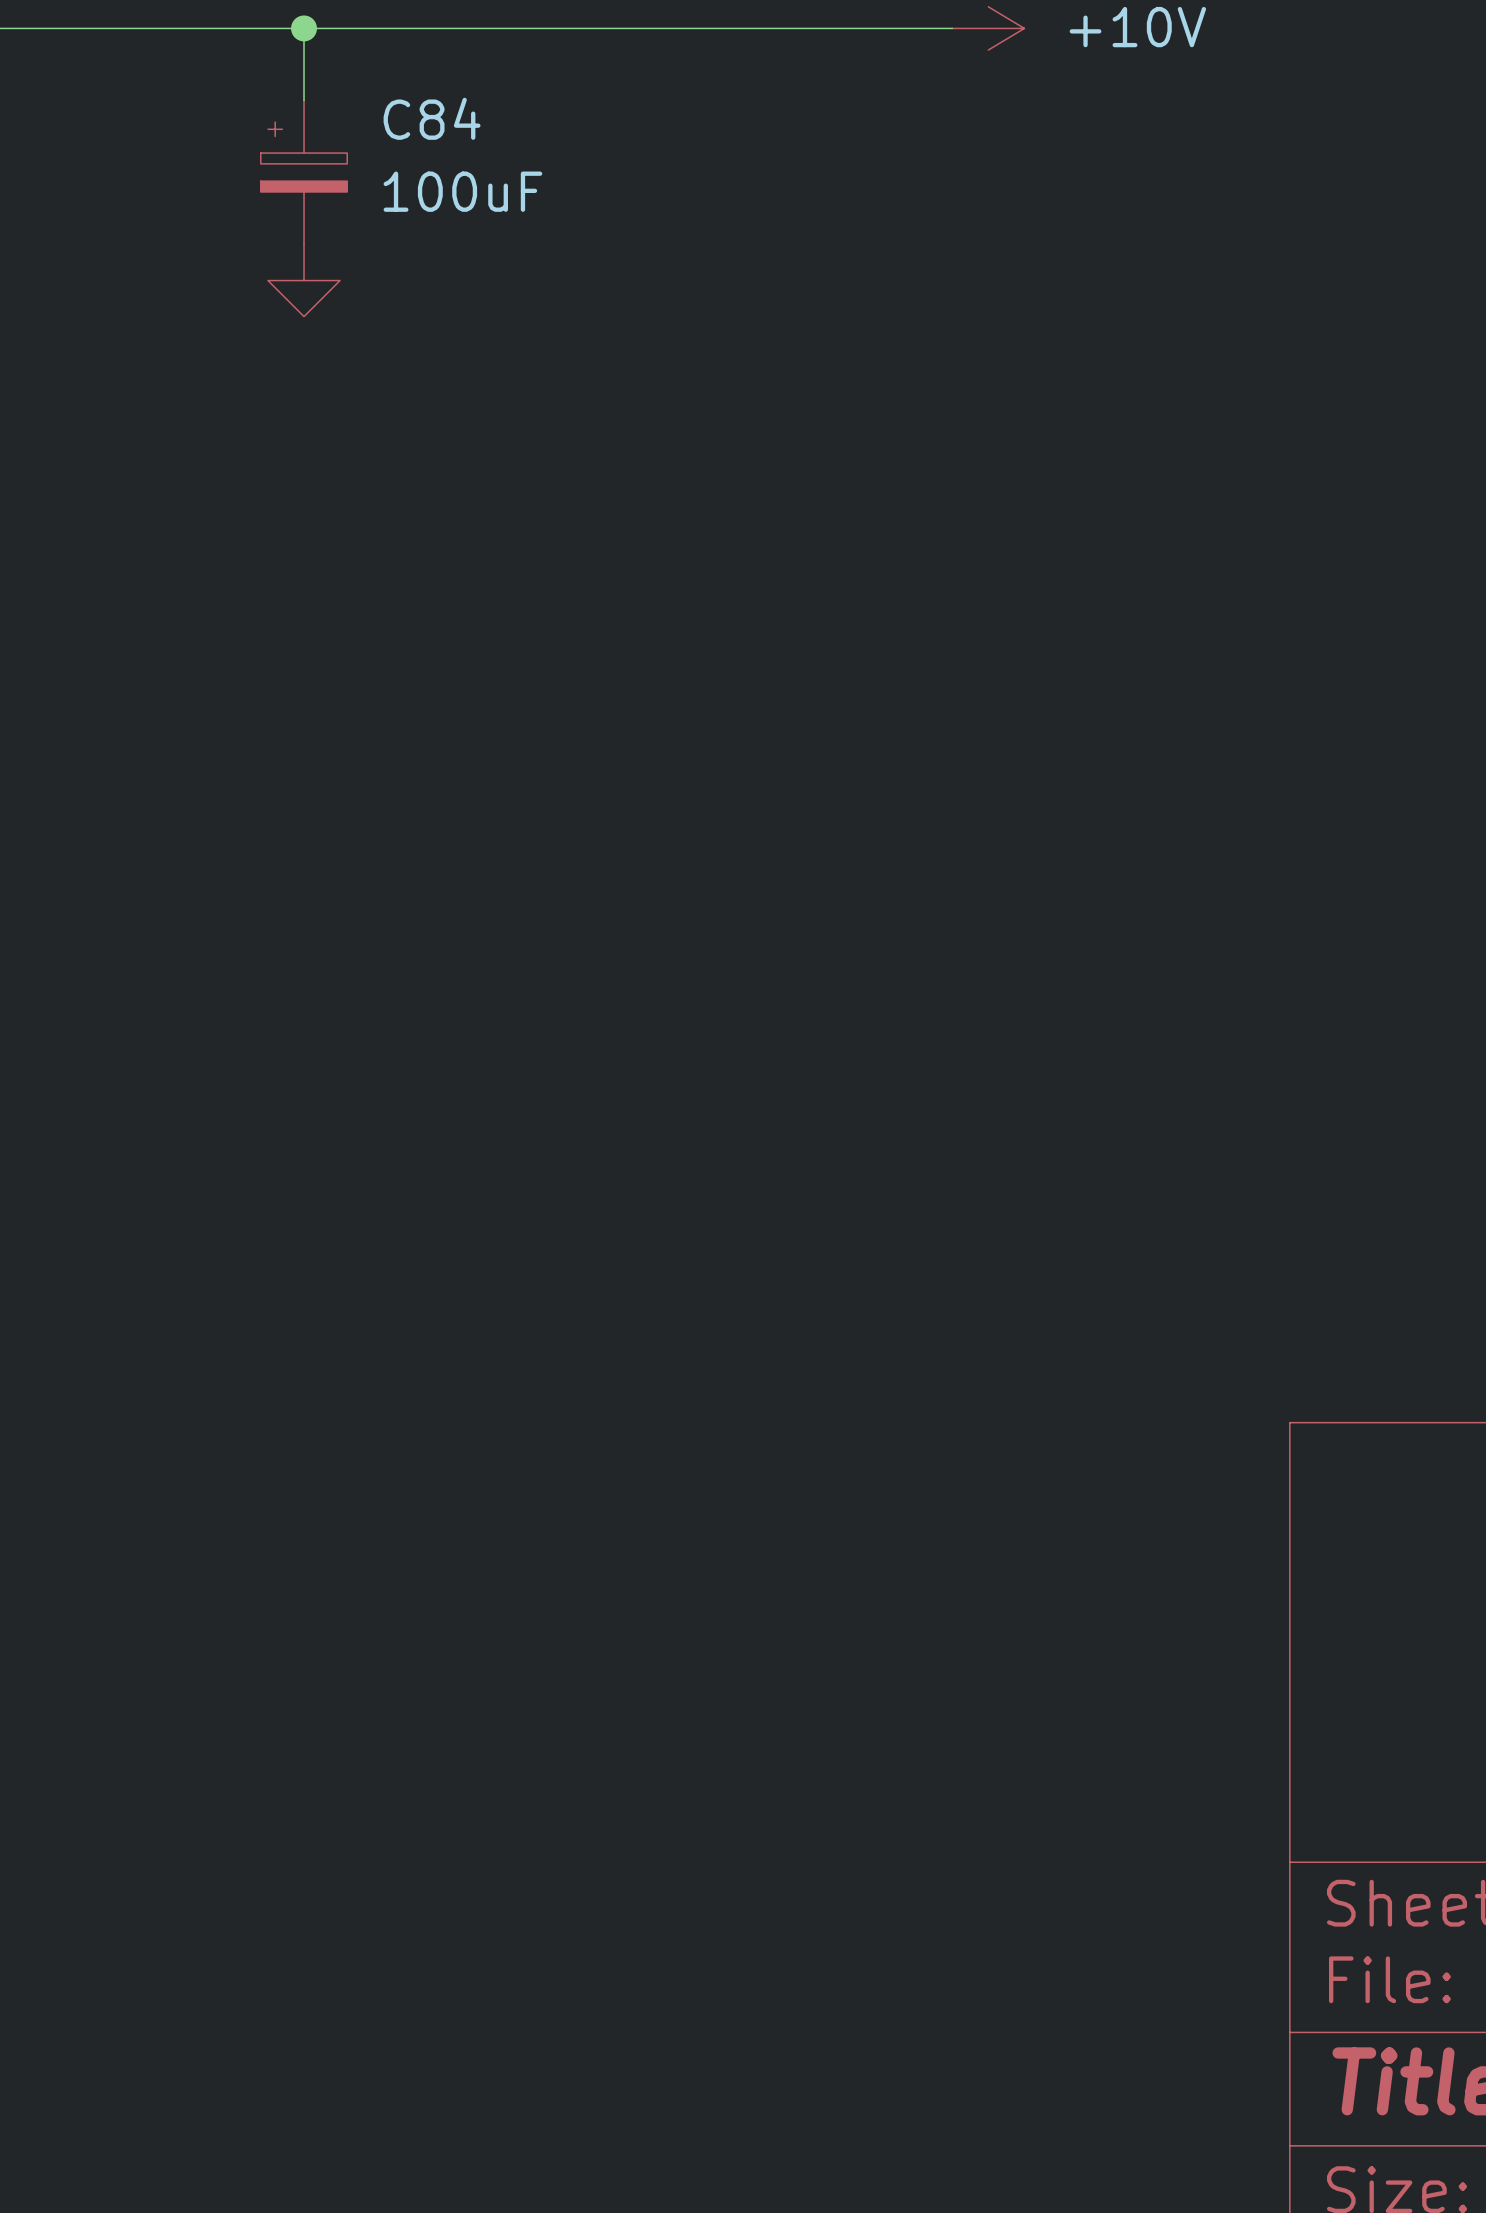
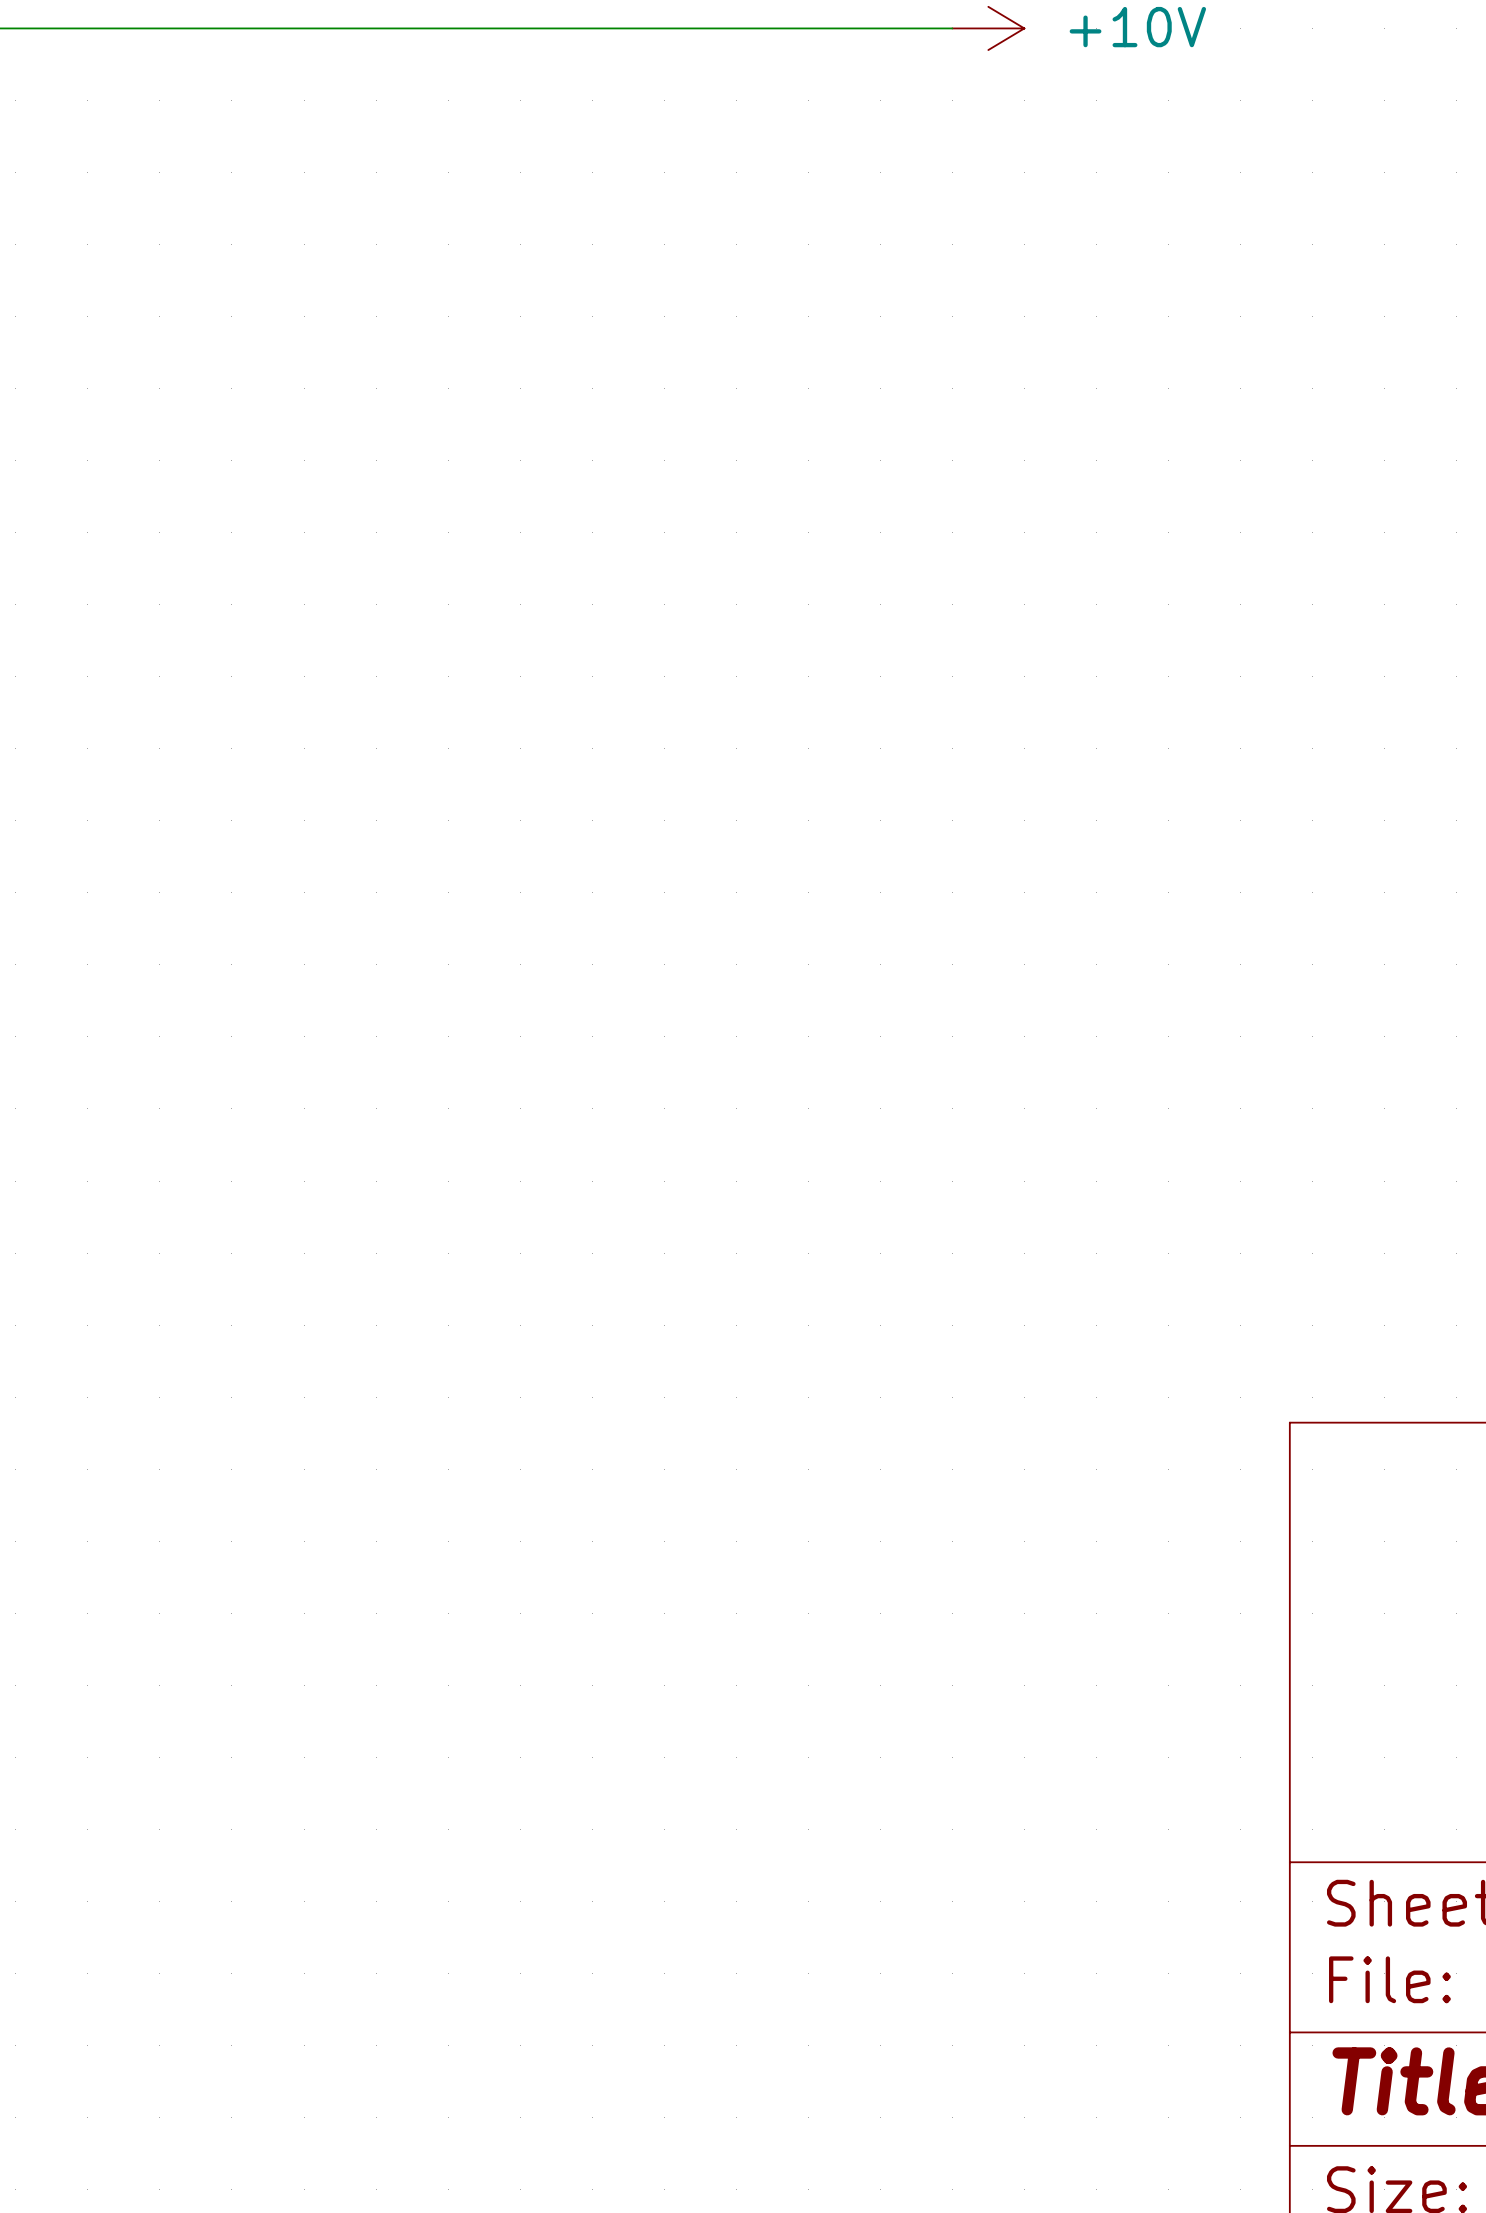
wire: (304, 28) (304, 100) -> none
junction: (304, 28) -> none
C84: 100uF (304, 172) -> none
power symbol: (304, 280) -> none

